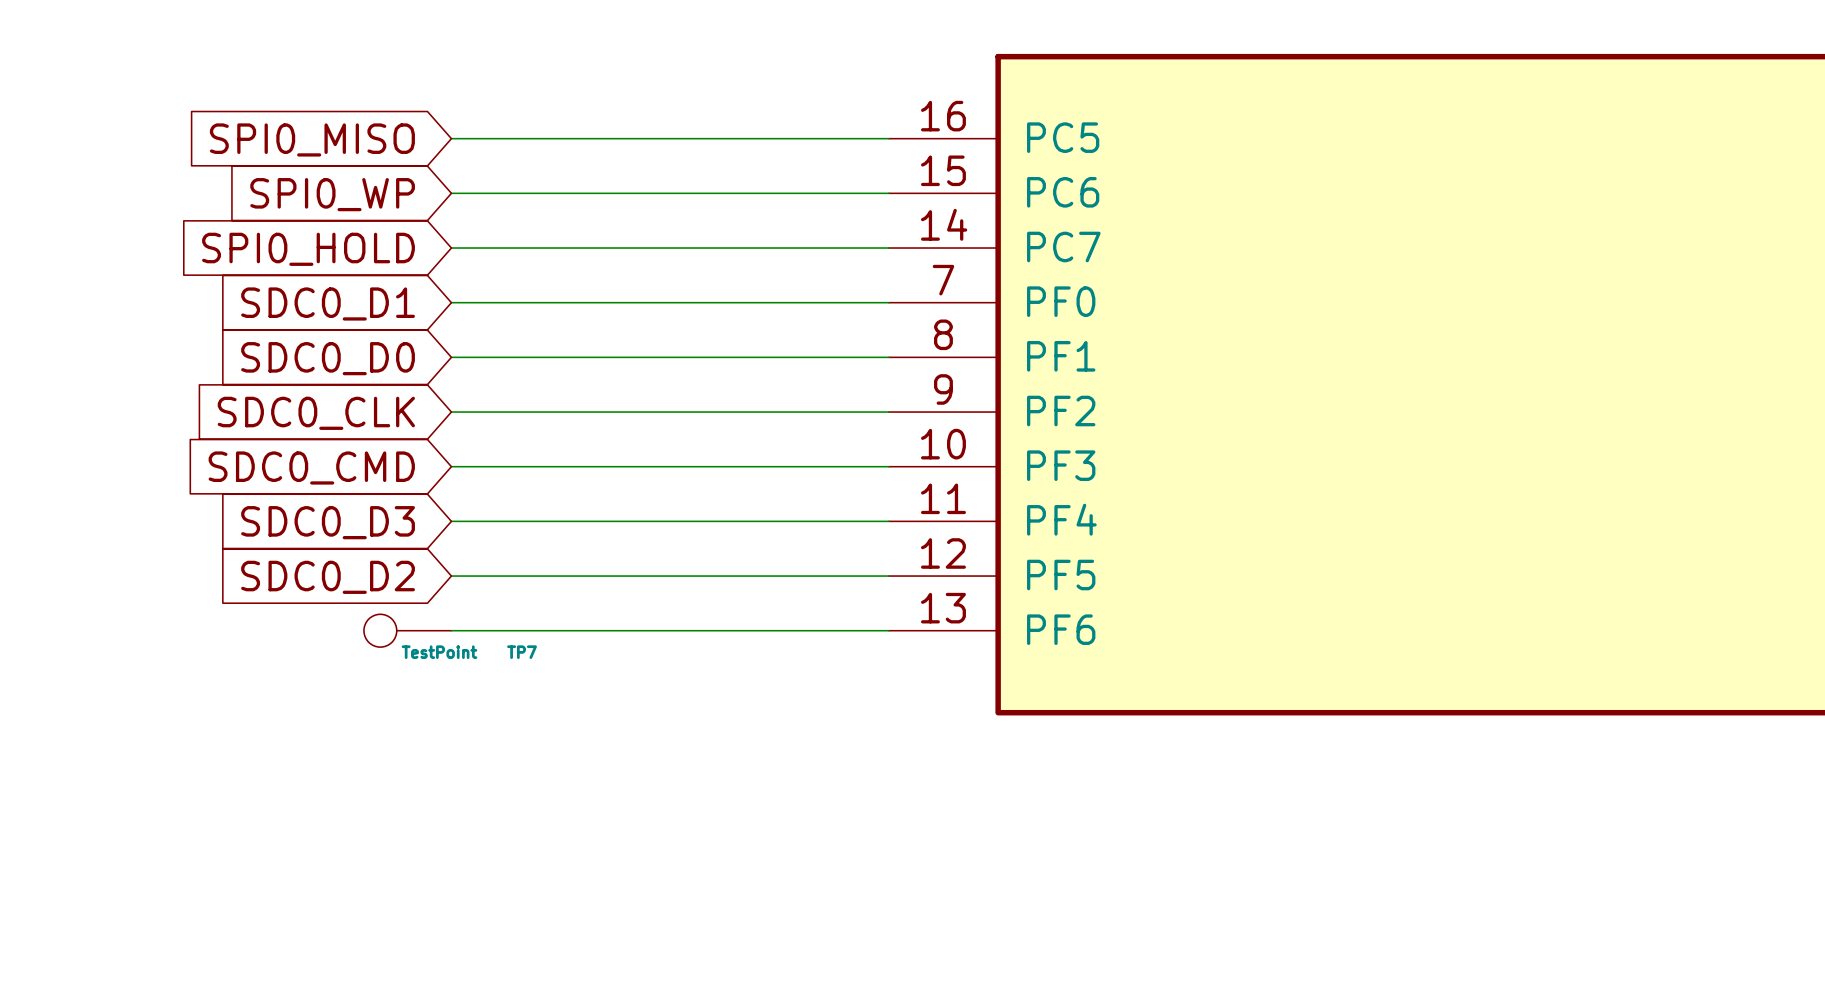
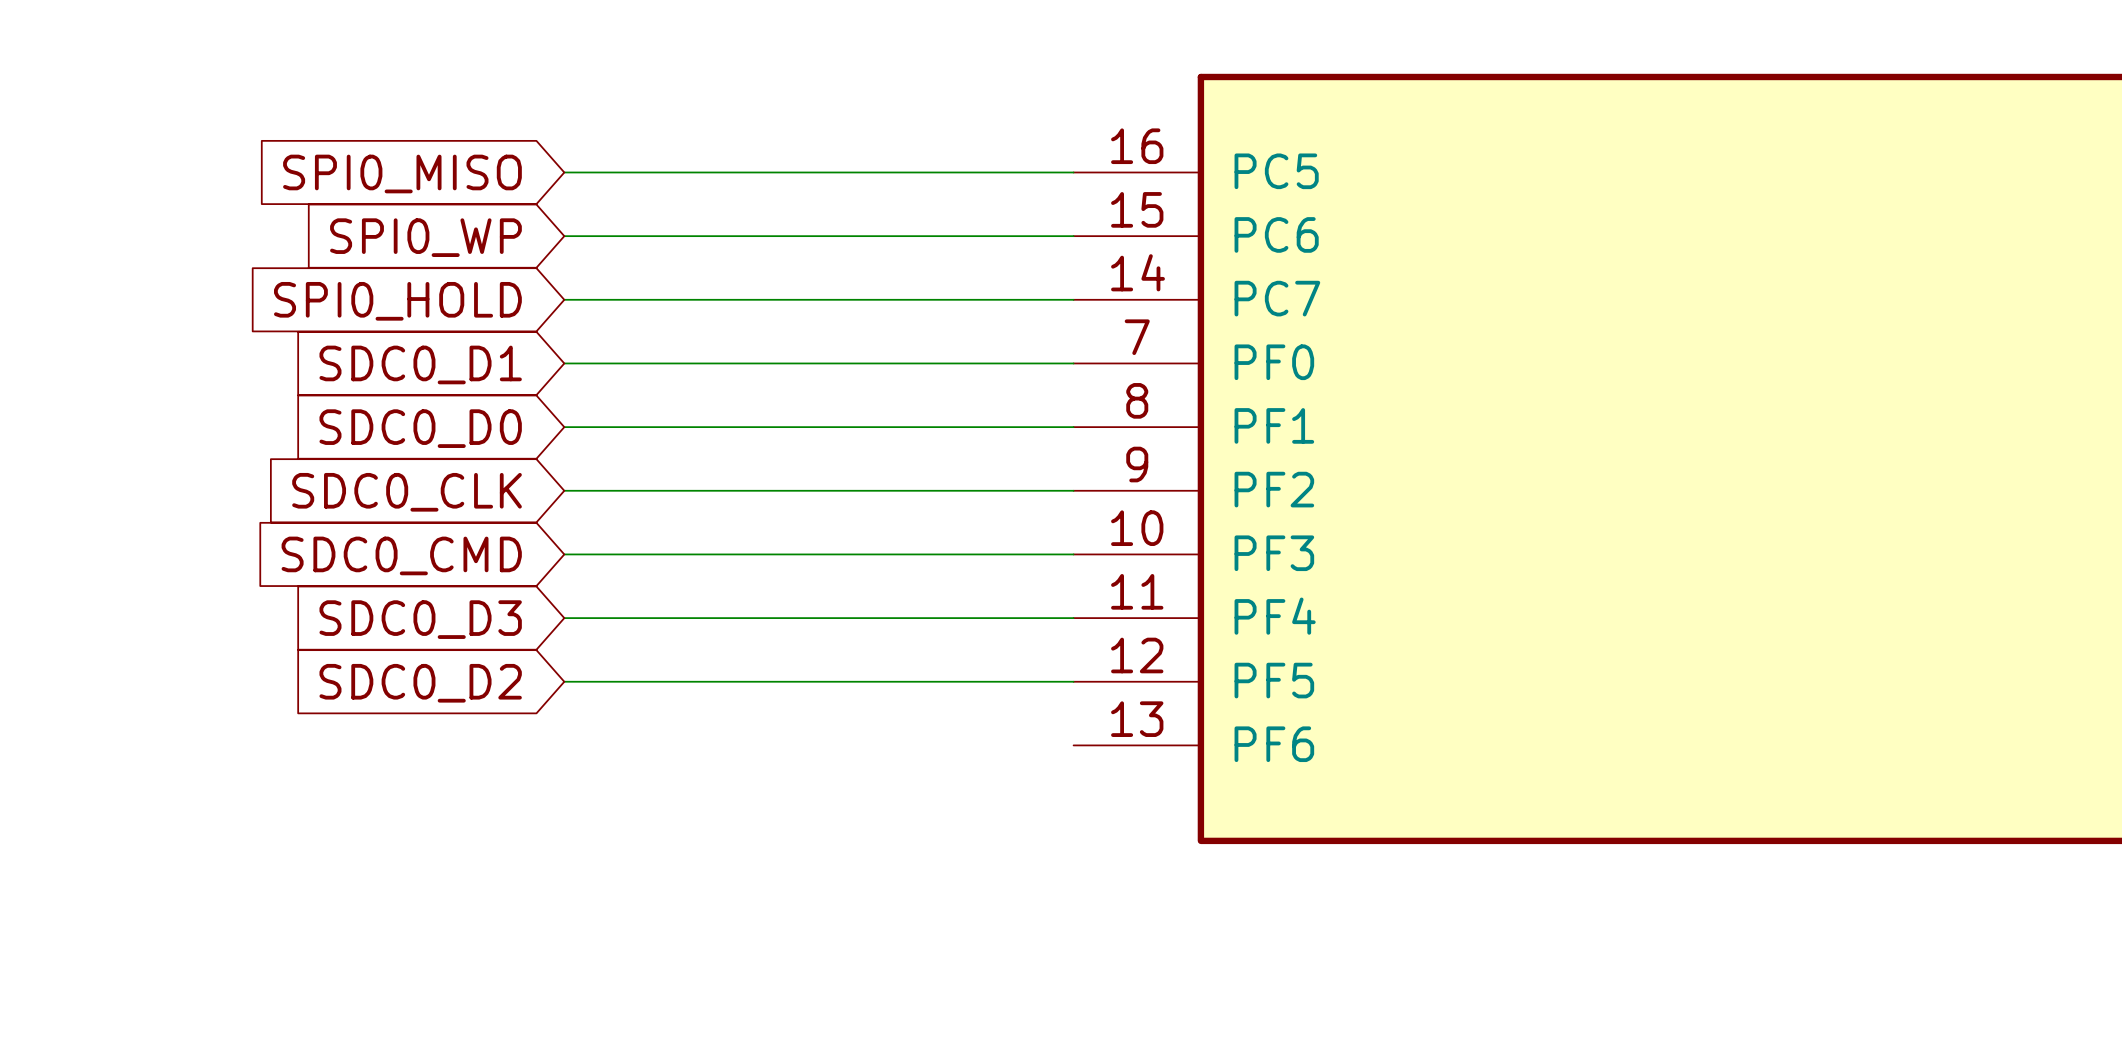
TP7: TestPoint (407, 630) -> none
wire: (451, 630) (888, 630) -> none

